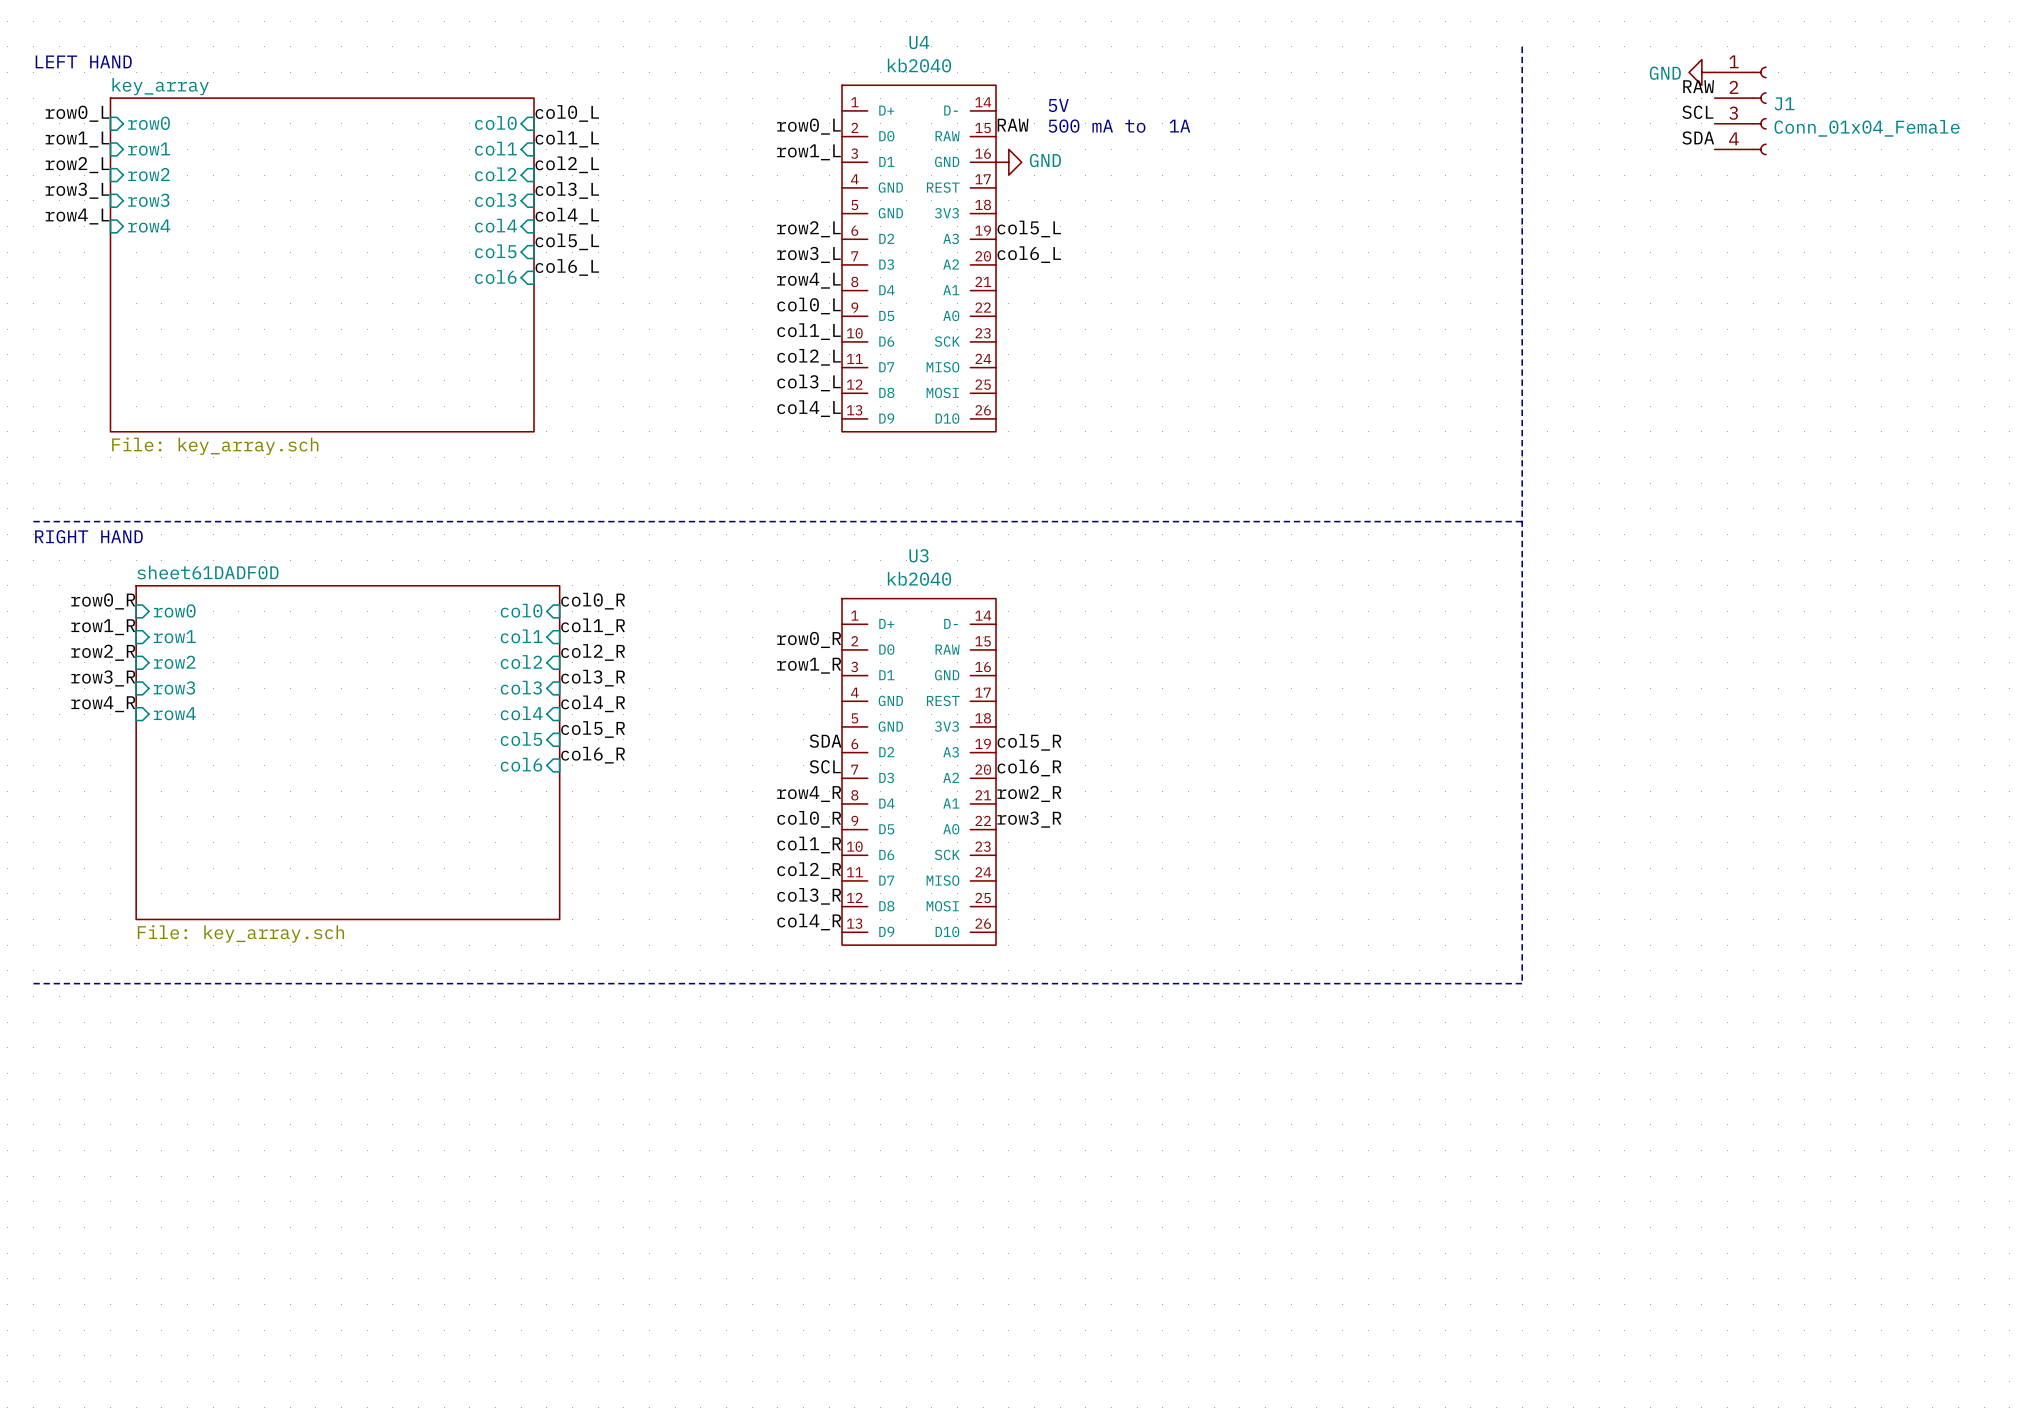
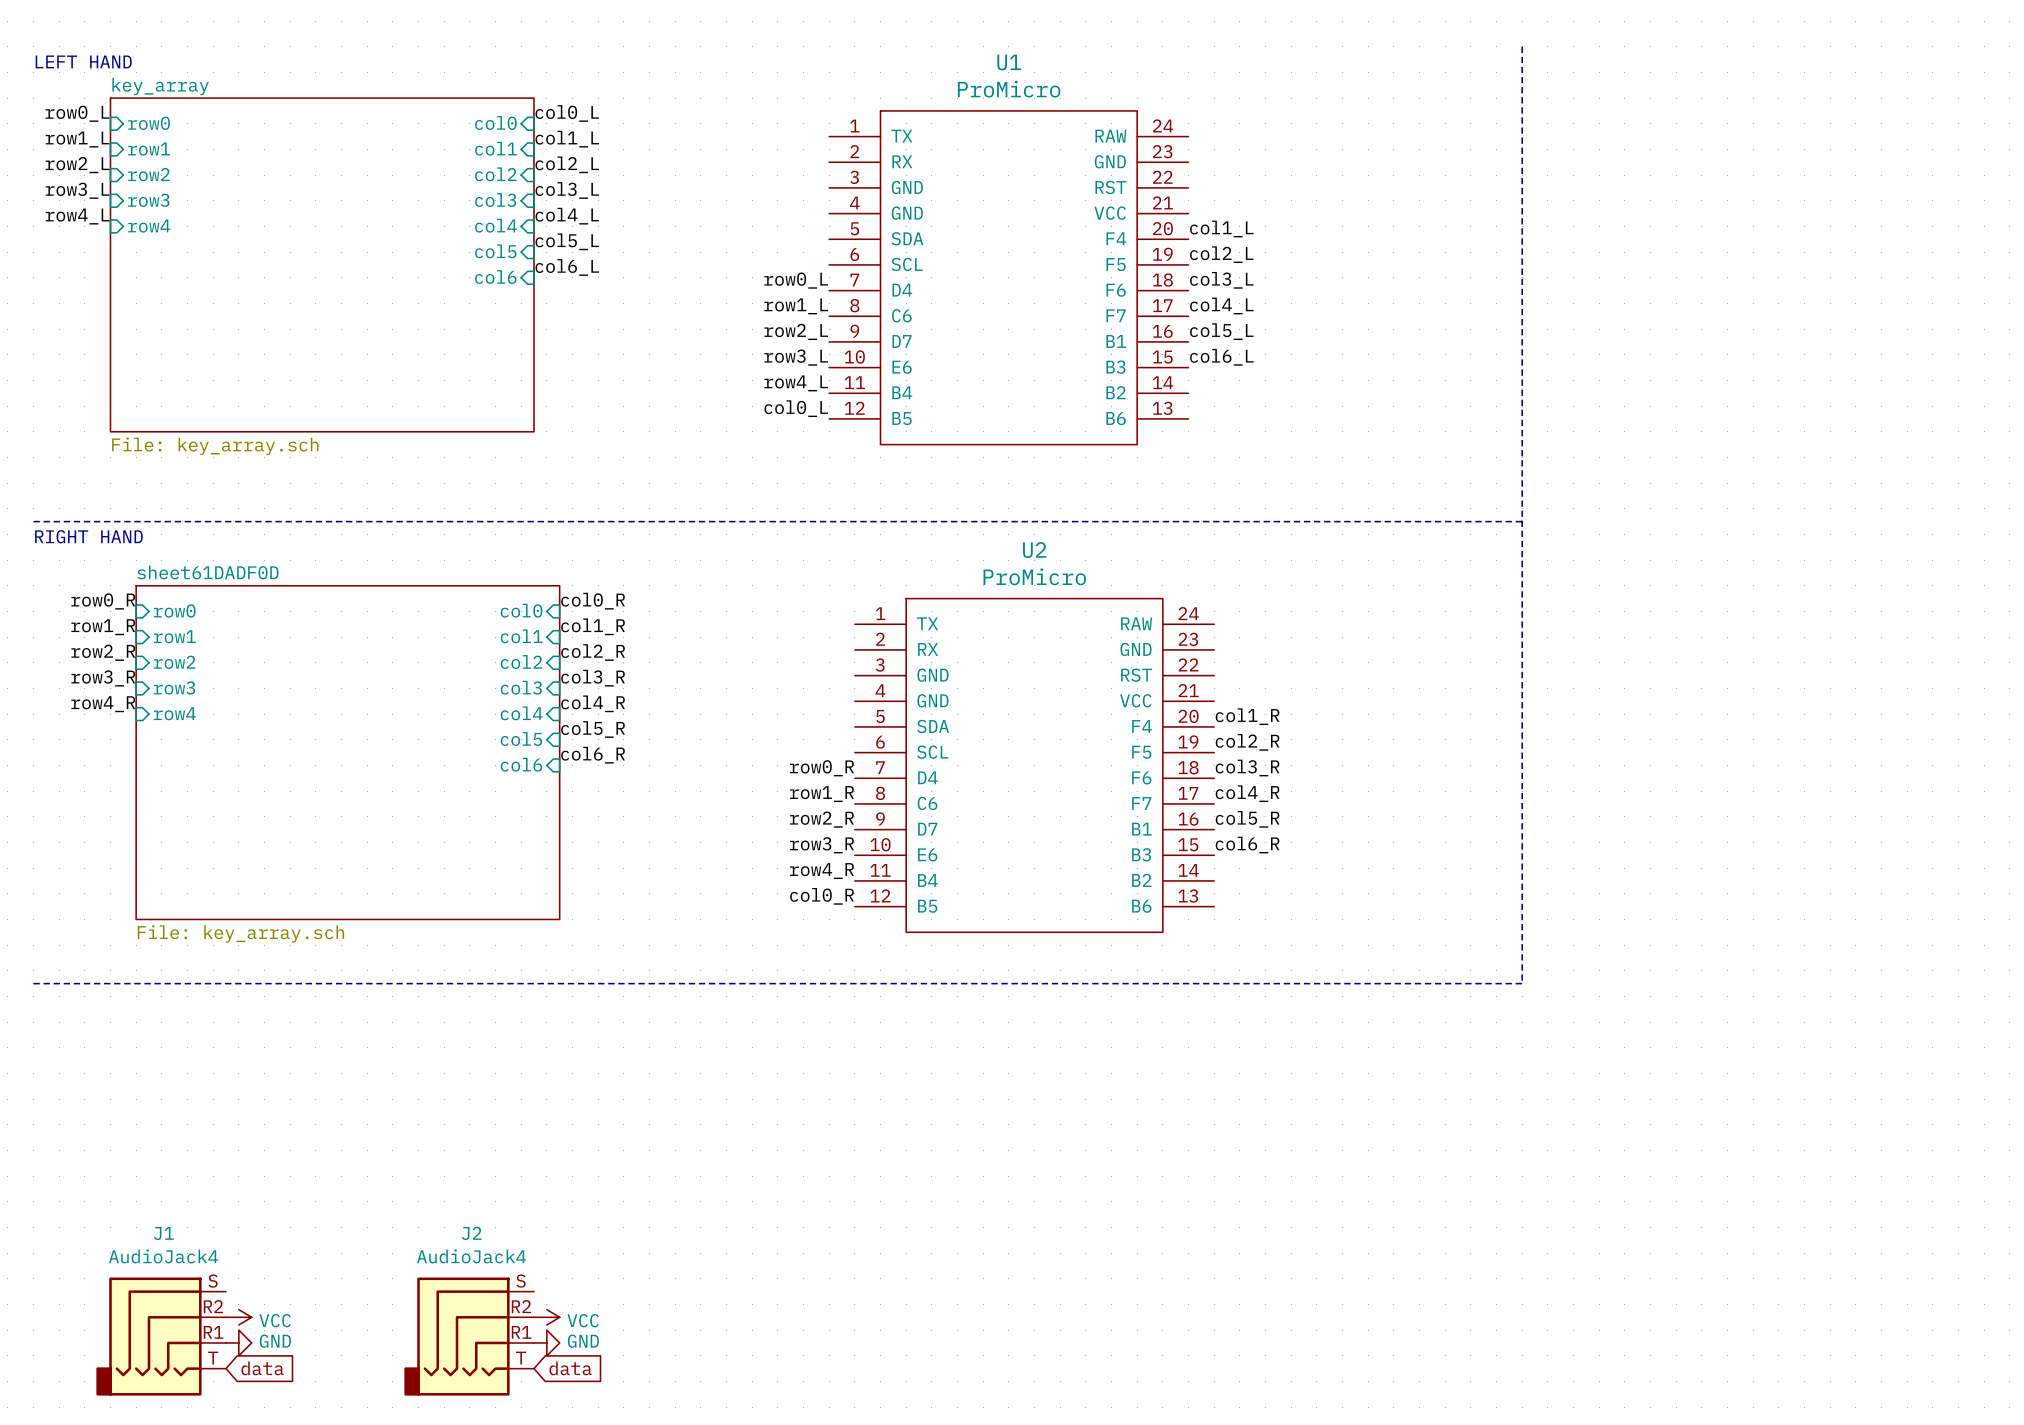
J1 symbol: [1714, 66, 1767, 156] -> [96, 1277, 226, 1396]
power symbol: GND (1701, 72) -> none
label: RAW (1698, 86) -> none
J1 name position: J1 (1784, 103) -> J1 (163, 1233)
text: 5V (1058, 105) -> none
label: SCL (1697, 112) -> none
label: RAW (1013, 125) -> none
label position: row0_L (809, 126) -> row0_L (796, 280)
text: 500 mA to 1A (1119, 126) -> none
J1 value: Conn_01x04_Female (1867, 128) -> AudioJack4 (163, 1256)
label: SDA (1698, 137) -> none
label position: row1_L (809, 152) -> row1_L (796, 306)
power symbol: GND (1008, 162) -> none
label position: col5_L (1029, 228) -> col5_L (1221, 331)
label: none -> col1_L (1221, 228)
label position: row2_L (809, 229) -> row2_L (796, 331)
label position: row3_L (809, 254) -> row3_L (796, 357)
label position: col6_L (1029, 254) -> col6_L (1221, 357)
label: none -> col2_L (1221, 254)
U4: kb2040 (919, 258) -> none
U1: none -> ProMicro (1008, 277)
label position: row4_L (809, 280) -> row4_L (796, 383)
label: none -> col3_L (1221, 280)
label position: col0_L (809, 305) -> col0_L (796, 408)
label: none -> col4_L (1221, 305)
label: col1_L (809, 331) -> none
label: col2_L (809, 357) -> none
label: col3_L (809, 382) -> none
label: col4_L (809, 408) -> none
label position: row0_R (809, 639) -> row0_R (821, 768)
label position: row1_R (809, 665) -> row1_R (821, 794)
label: none -> col1_R (1247, 716)
label: SDA (825, 741) -> none
label position: col5_R (1029, 742) -> col5_R (1247, 819)
label: none -> col2_R (1247, 742)
U2: none -> ProMicro (1034, 765)
label: SCL (825, 766) -> none
label position: col6_R (1029, 768) -> col6_R (1247, 845)
label: none -> col3_R (1247, 768)
U3: kb2040 (919, 771) -> none
label position: row2_R (1029, 793) -> row2_R (821, 819)
label: none -> col4_R (1247, 793)
label position: row4_R (809, 794) -> row4_R (821, 871)
label position: col0_R (809, 819) -> col0_R (822, 896)
label position: row3_R (1029, 819) -> row3_R (821, 845)
label: col1_R (809, 845) -> none
label: col2_R (809, 870) -> none
label: col3_R (809, 896) -> none
label: col4_R (809, 922) -> none
power symbol: none -> VCC (238, 1317)
power symbol: none -> VCC (546, 1317)
J2: none -> AudioJack4 (469, 1336)
power symbol: none -> GND (238, 1342)
power symbol: none -> GND (546, 1342)
global label: none -> data (262, 1368)
global label: none -> data (570, 1368)

